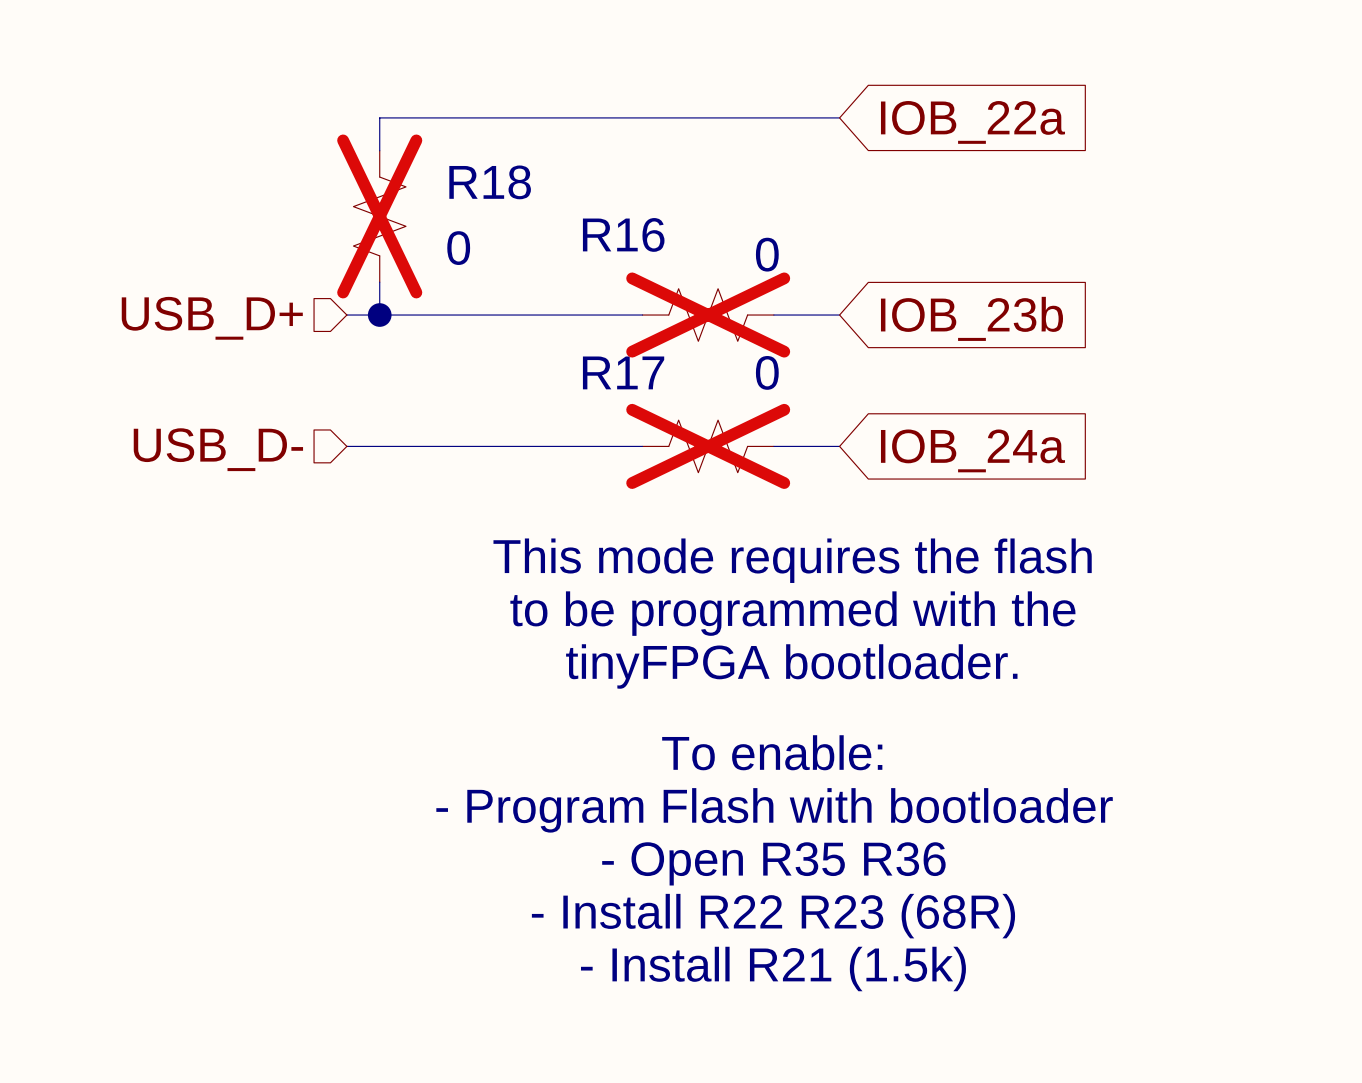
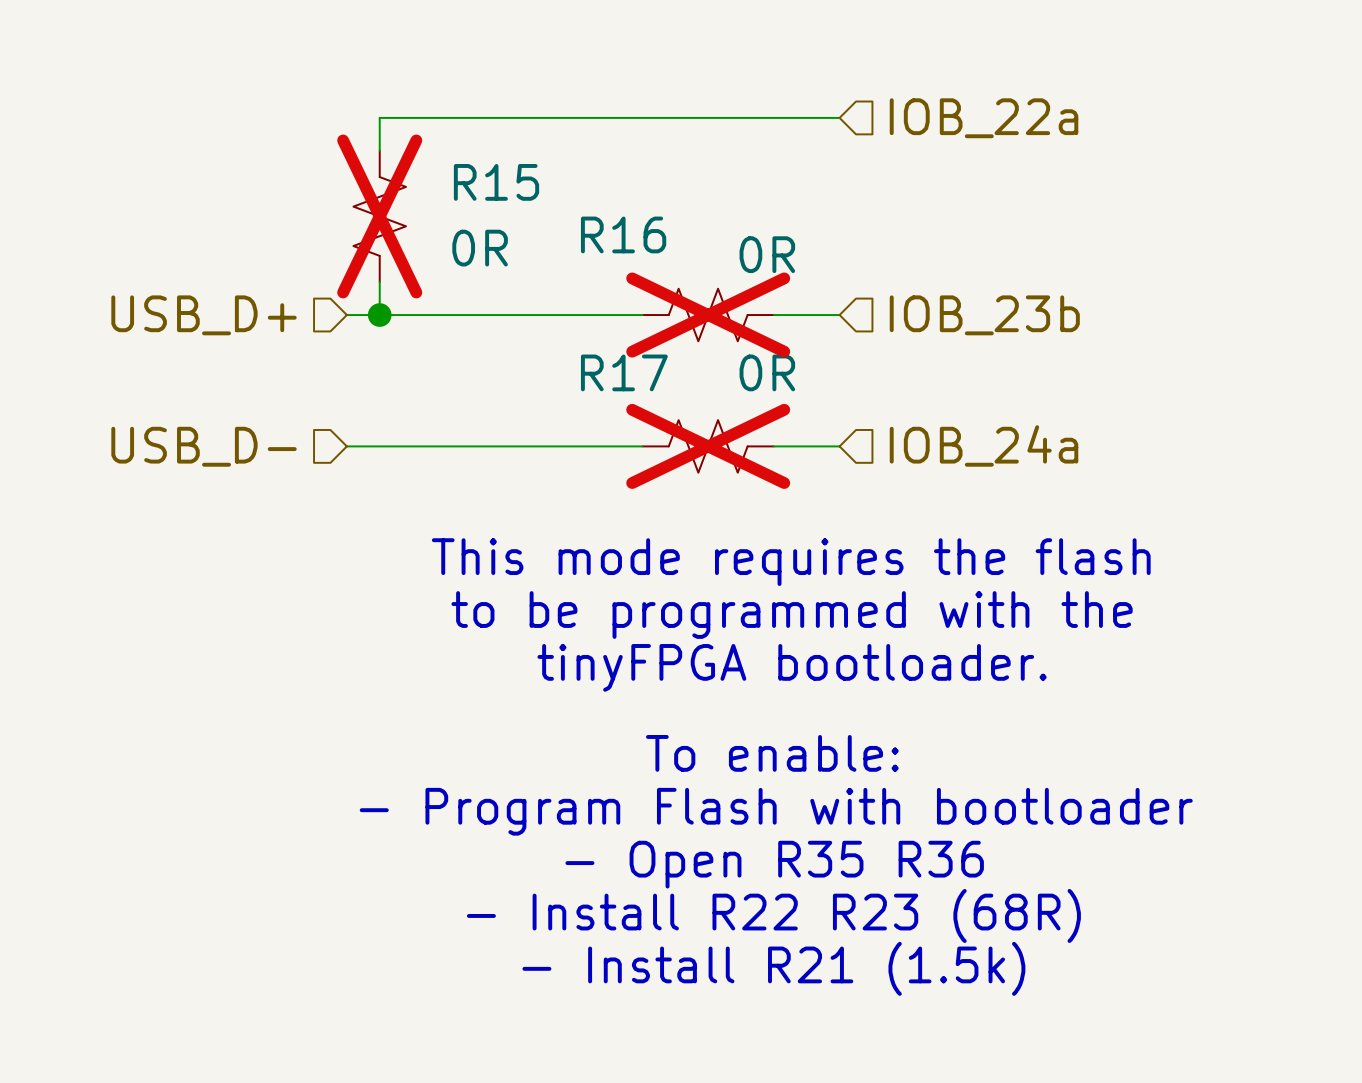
hierarchical label: none -> IOB_22a (984, 118)
global label: IOB_22a (972, 122) -> none
R18 name: R18 (490, 182) -> R15 (496, 182)
R18 value: 0 (458, 248) -> 0R (480, 248)
R16 value: 0 (767, 254) -> 0R (767, 254)
hierarchical label: none -> IOB_23b (984, 315)
global label: IOB_23b (971, 318) -> none
R17 value: 0 (767, 372) -> 0R (767, 372)
hierarchical label: none -> IOB_24a (984, 445)
global label: IOB_24a (972, 450) -> none

